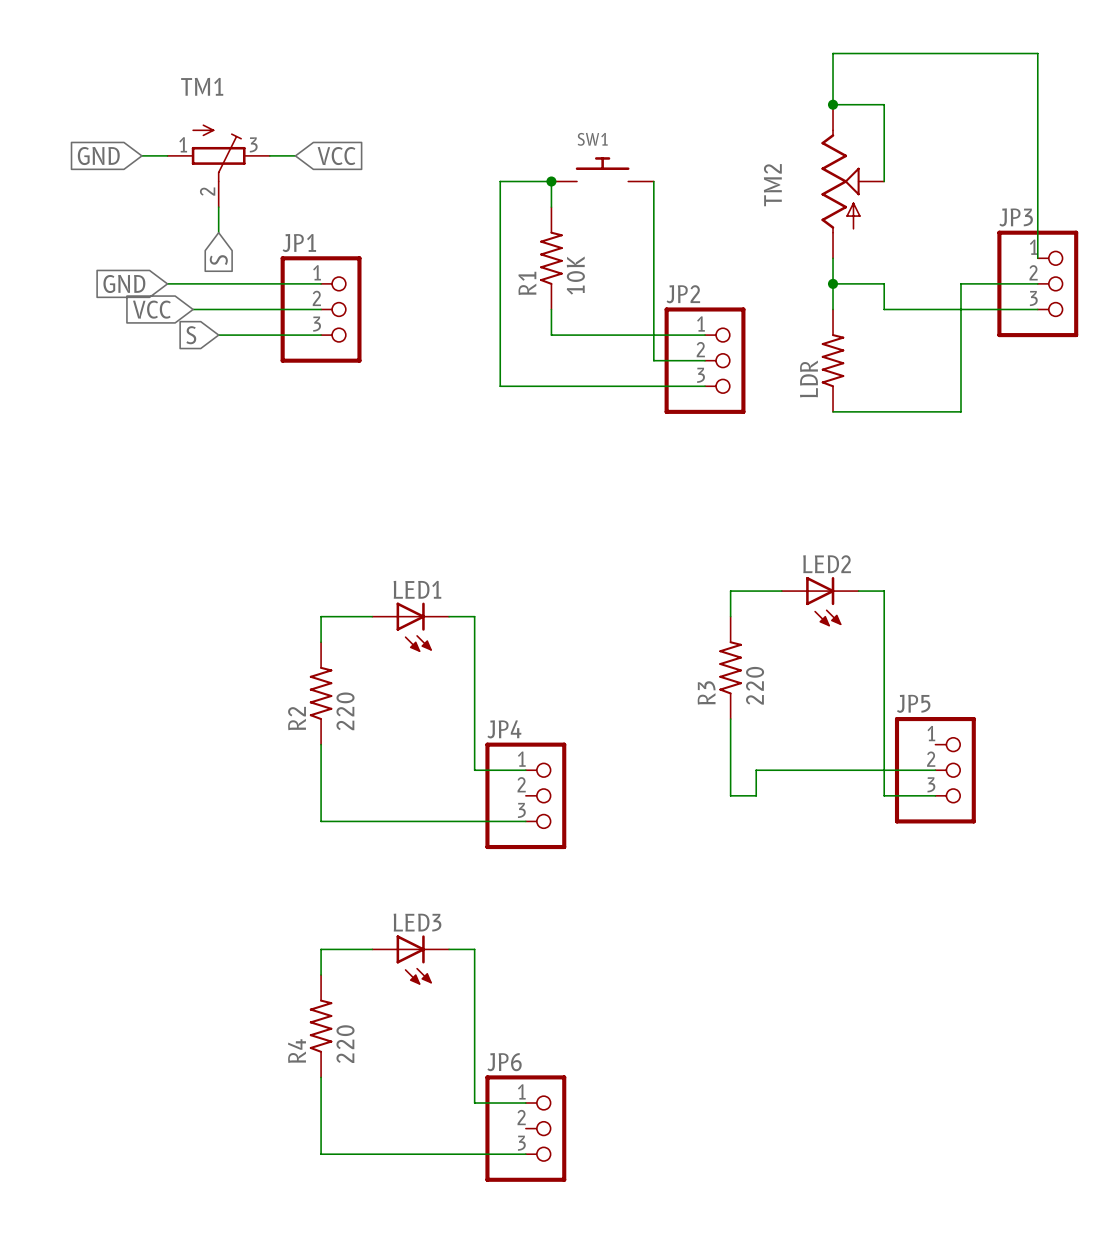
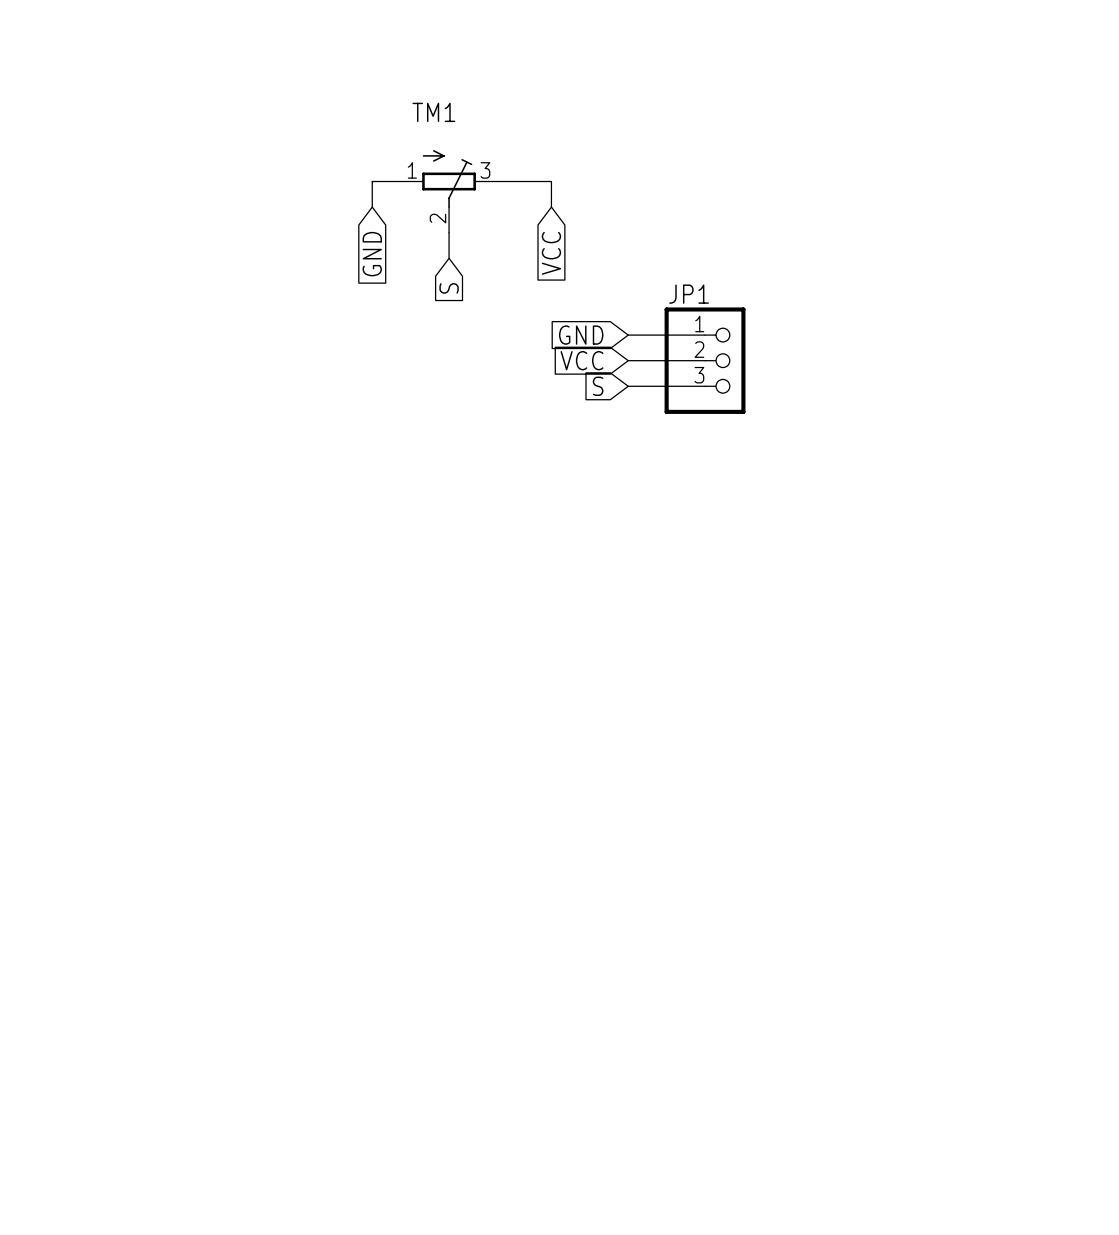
junction: (833, 104) -> none
wire: (141, 155) (167, 155) -> none
wire: (269, 155) (295, 155) -> none
global label: GND (98, 156) -> none
global label: VCC (336, 156) -> none
TM1 position: (218, 165) -> (449, 191)
SW1: (602, 169) -> none
wire: none -> (397, 181) (372, 181) (372, 207)
wire: (500, 181) (500, 386) (628, 386) -> none
junction: (551, 181) -> none
wire: (653, 181) (653, 360) -> (628, 360) (653, 360)
TM2: (852, 181) -> none
wire: (884, 181) (884, 104) (833, 104) (833, 53) (1037, 53) (1037, 258) -> none
wire: (218, 207) (218, 232) -> (449, 232) (449, 258)
global label: none -> VCC (551, 253)
global label: none -> GND (372, 254)
R1: 10K (551, 258) -> none
wire: (833, 258) (833, 309) -> none
global label: S (218, 260) -> none
global label: GND (124, 283) -> none
wire: (167, 283) (321, 283) -> none
wire: (833, 283) (884, 283) (884, 309) (1037, 309) -> none
junction: (833, 283) -> none
wire: (1037, 283) (960, 283) (960, 411) (833, 411) -> none
JP3: (1037, 283) -> none
global label: none -> S (449, 288)
JP2 name: JP2 (683, 294) -> JP1 (689, 294)
global label: VCC (151, 309) -> none
wire: (193, 309) (321, 309) -> none
JP1: (321, 309) -> none
wire: (551, 309) (551, 335) (628, 335) -> none
global label: S (191, 335) -> none
wire: (218, 335) (321, 335) -> none
global label: none -> GND (581, 335)
global label: none -> VCC (581, 360)
LDR: (833, 360) -> none
global label: none -> S (598, 386)
wire: (781, 591) (730, 591) (730, 616) -> none
wire: (858, 591) (884, 591) (884, 795) (935, 795) -> none
LED2: (820, 601) -> none
wire: (372, 616) (321, 616) (321, 642) -> none
wire: (449, 616) (474, 616) (474, 770) (525, 770) -> none
LED1: (410, 627) -> none
R3: 220 (730, 667) -> none
R2: 220 (321, 693) -> none
wire: (730, 719) (730, 795) (756, 795) (756, 770) (935, 770) -> none
wire: (321, 744) (321, 821) (525, 821) -> none
JP5: (935, 770) -> none
JP4: (525, 795) -> none
wire: (372, 949) (321, 949) (321, 975) -> none
wire: (449, 949) (474, 949) (474, 1103) (525, 1103) -> none
LED3: (410, 960) -> none
R4: 220 (321, 1026) -> none
wire: (321, 1077) (321, 1154) (525, 1154) -> none
JP6: (525, 1128) -> none

